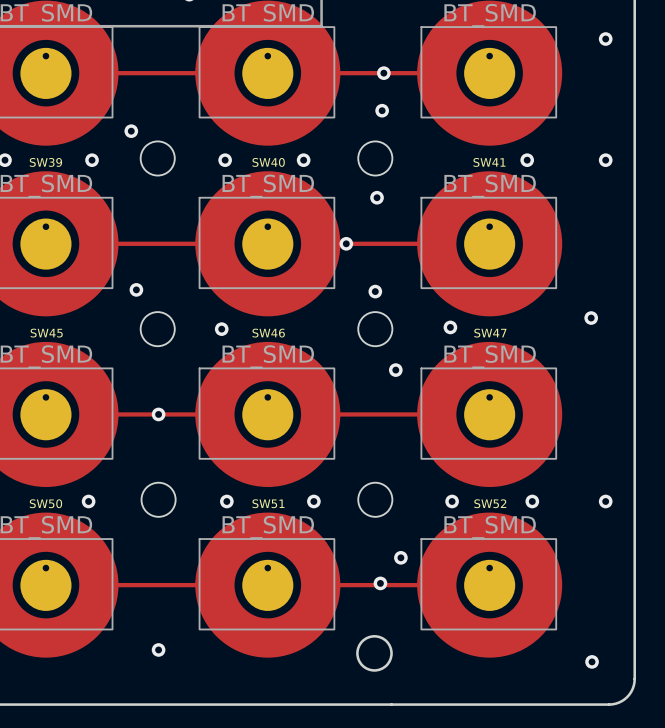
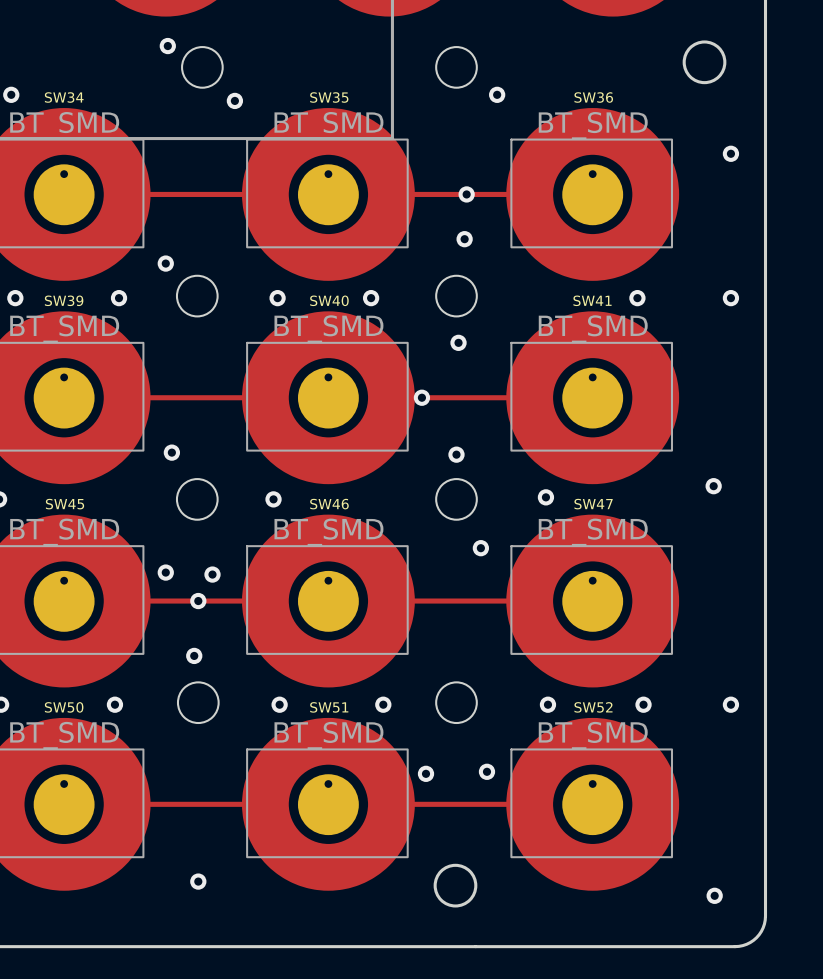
via: none -> (165, 572)
via: none -> (212, 574)
via: none -> (194, 655)
via position: (380, 583) -> (426, 773)

